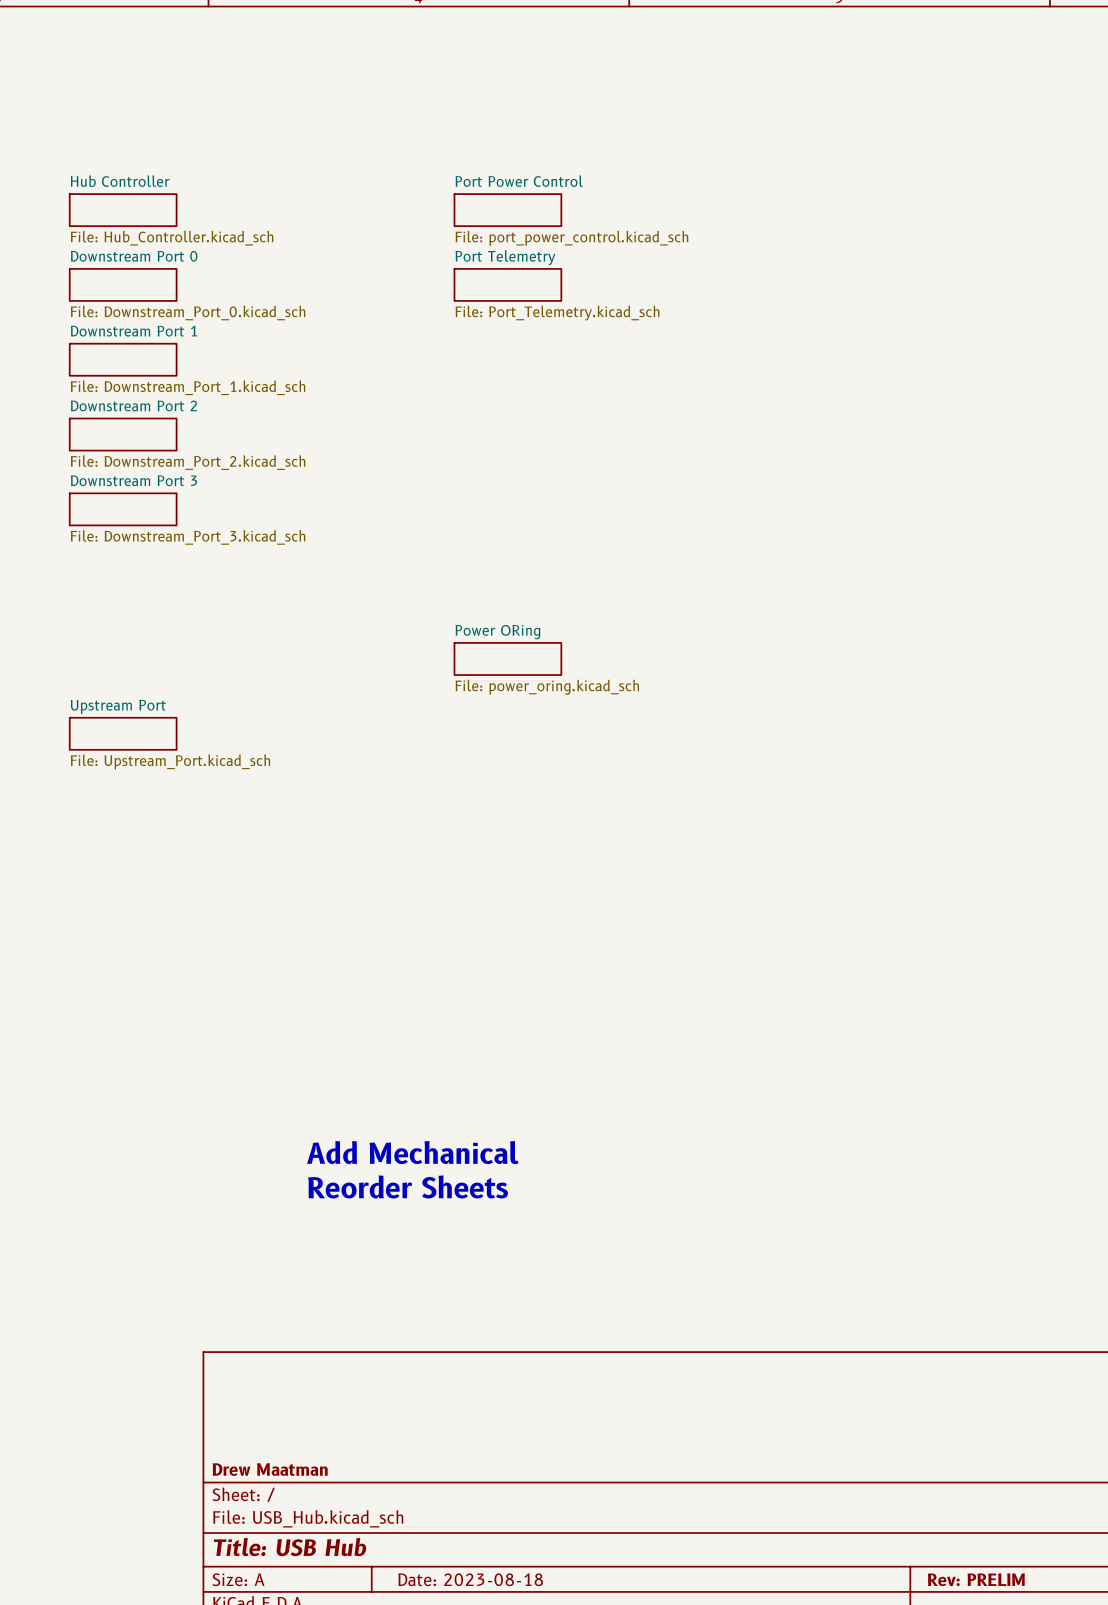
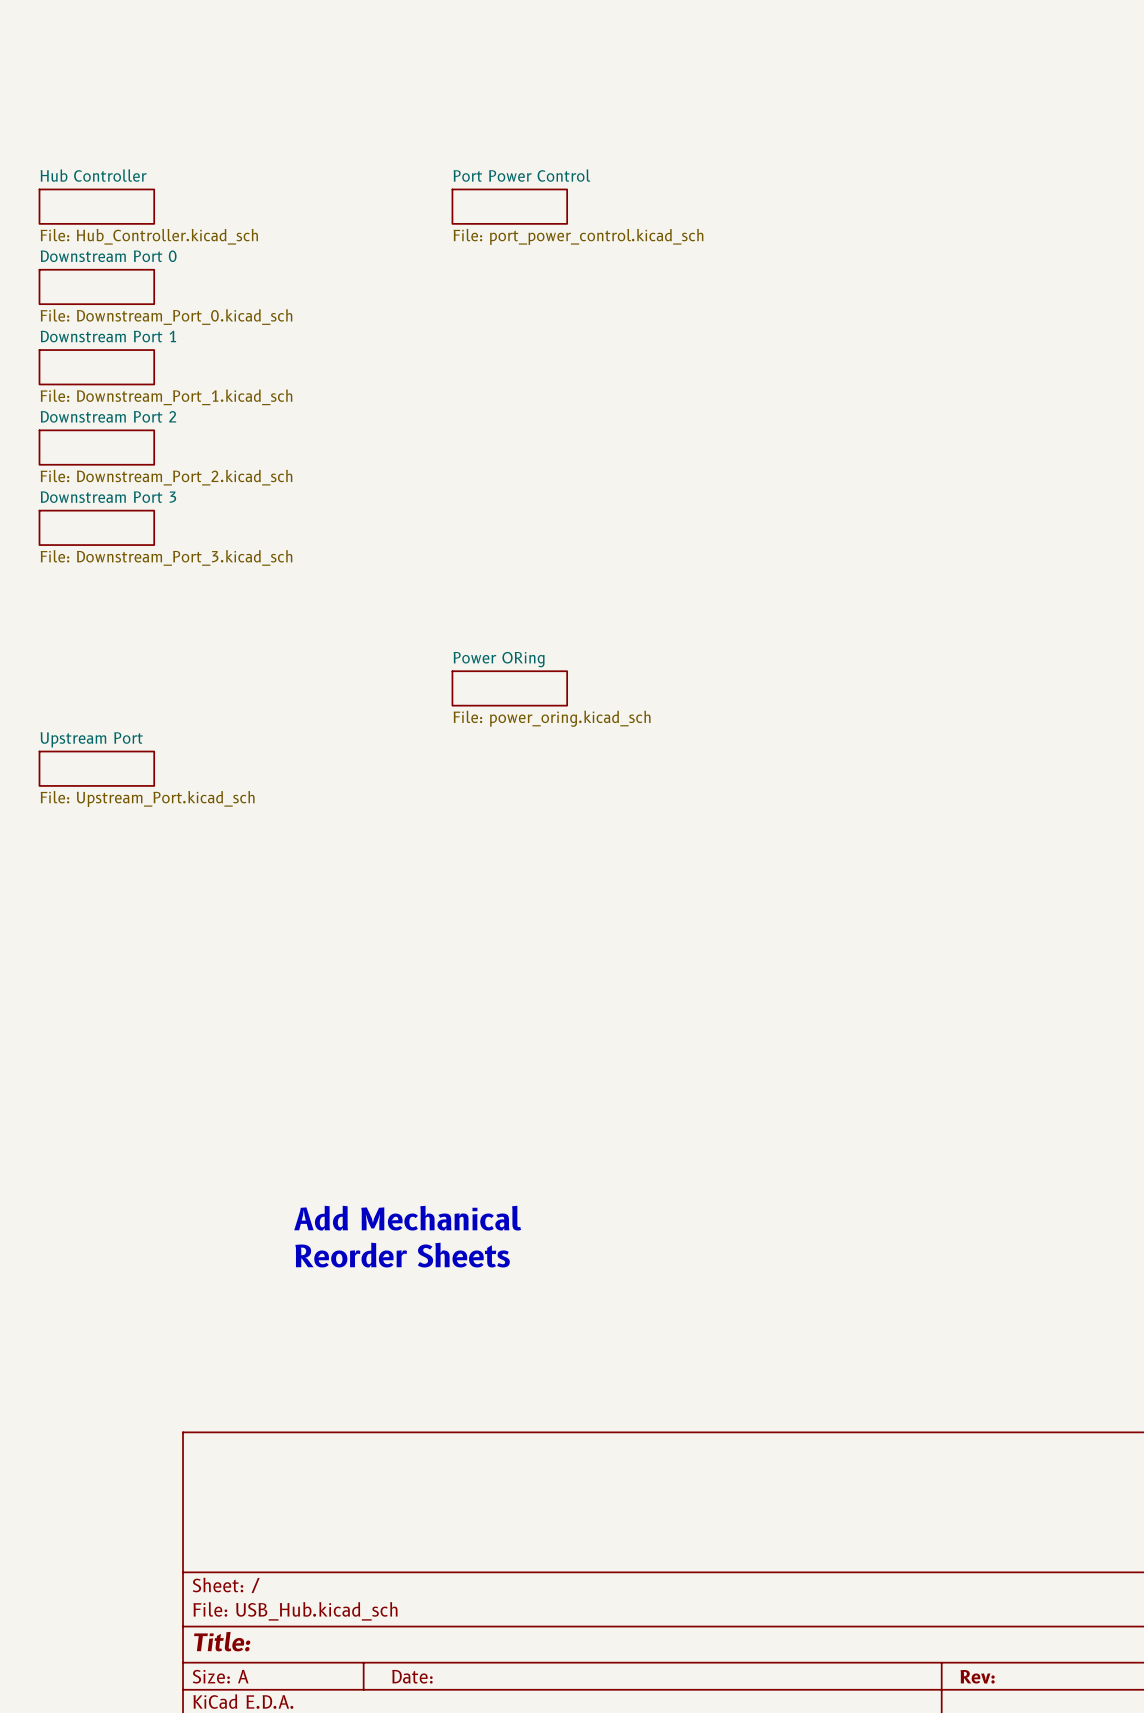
sheet Port Telemetry: File: Port_Telemetry.kicad_sch (507, 284) -> none
title block: Drew Maatman (270, 1469) -> none
title block: Title: USB Hub (290, 1547) -> Title: (222, 1641)
title block: Date: 2023-08-18 (470, 1579) -> Date: (412, 1676)
title block: Rev: PRELIM (976, 1579) -> Rev: (977, 1676)

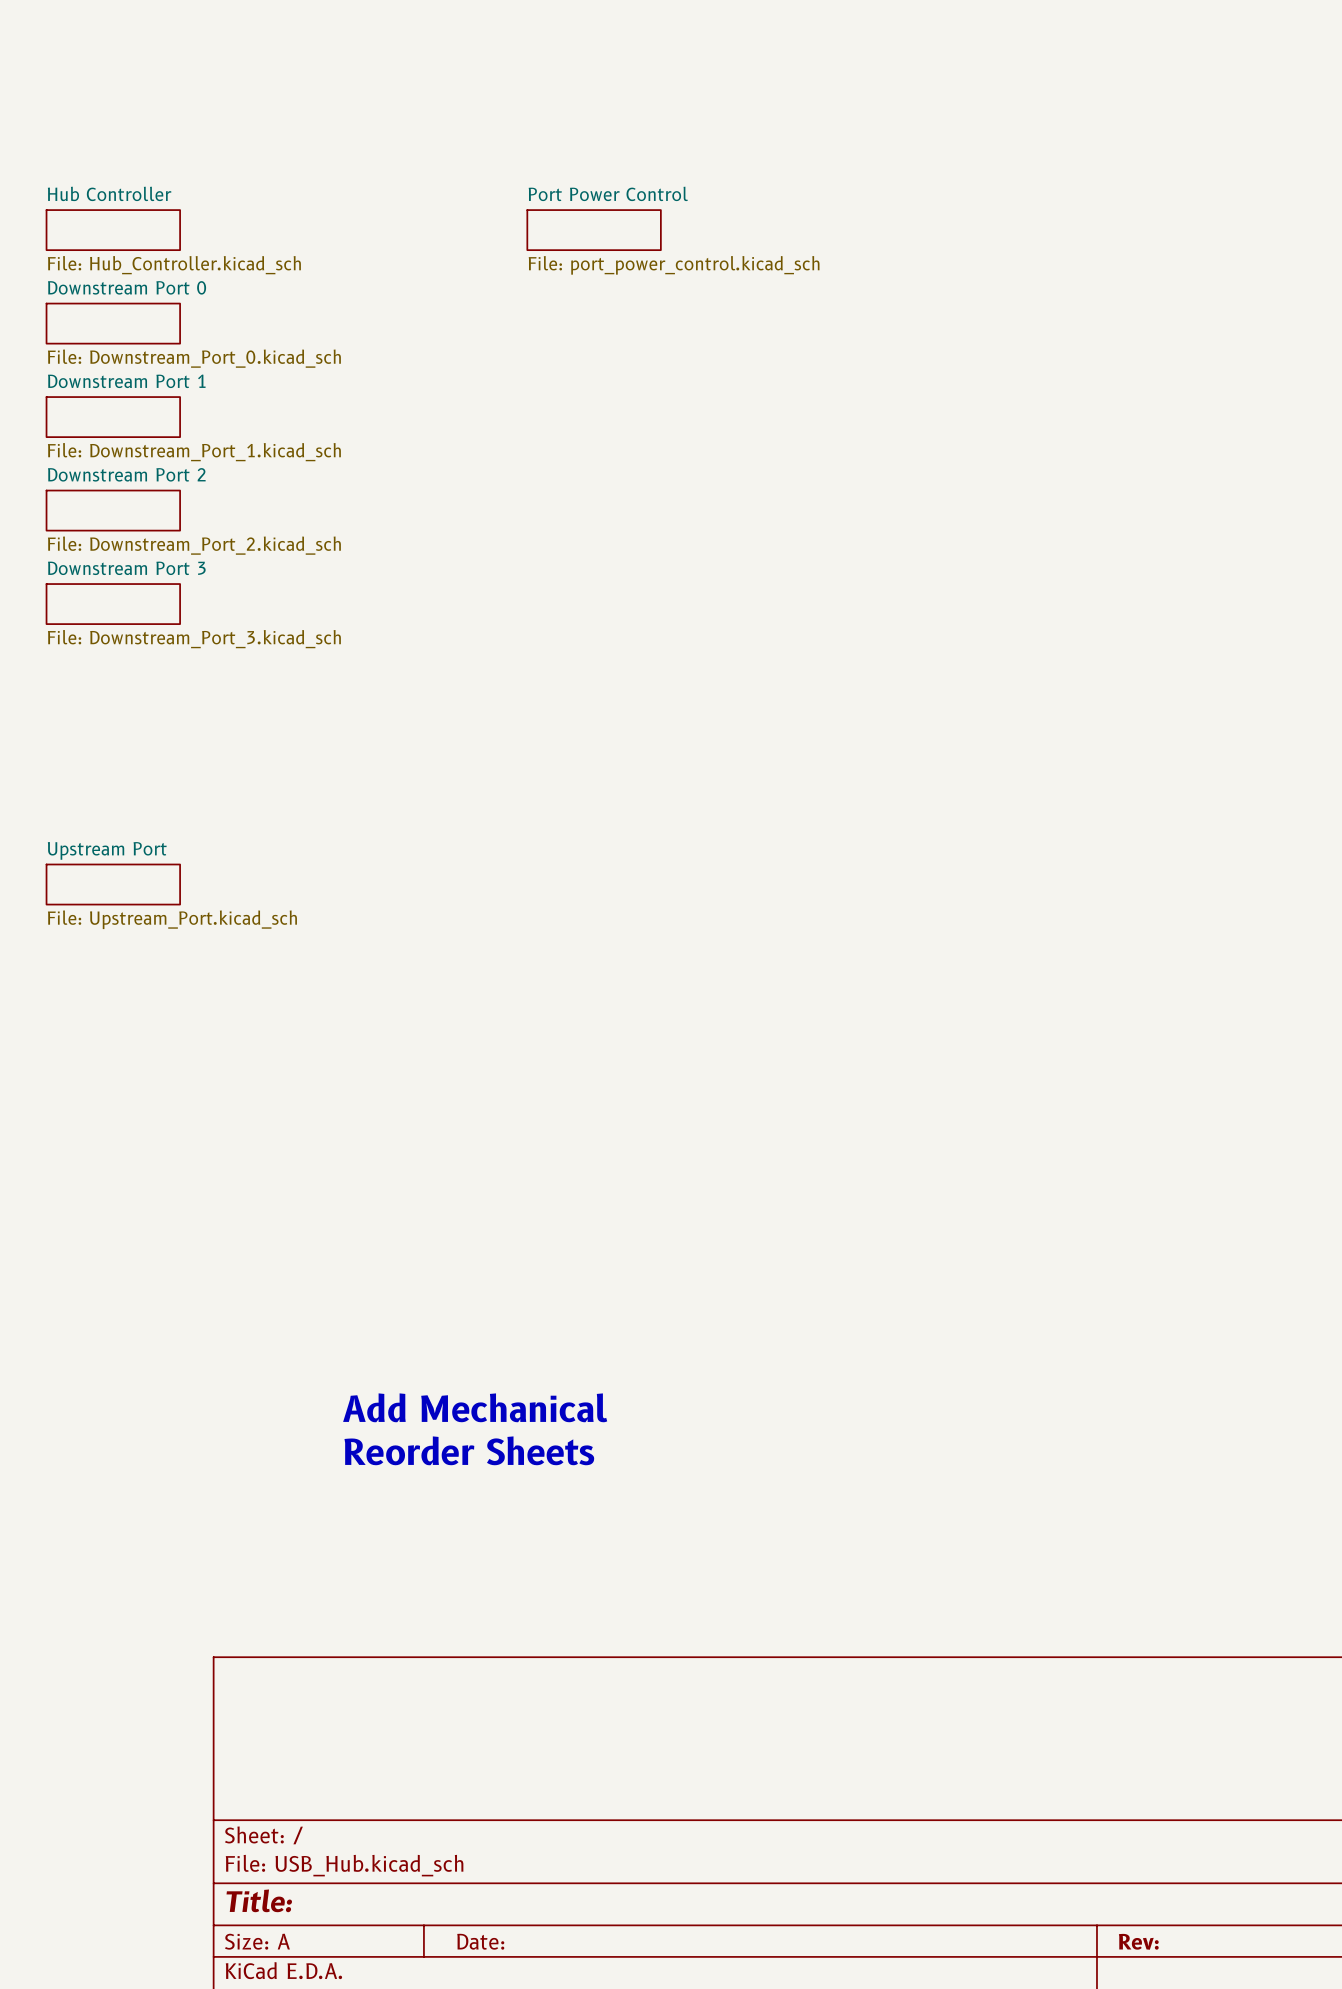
sheet Power ORing: File: power_oring.kicad_sch (509, 688) -> none

